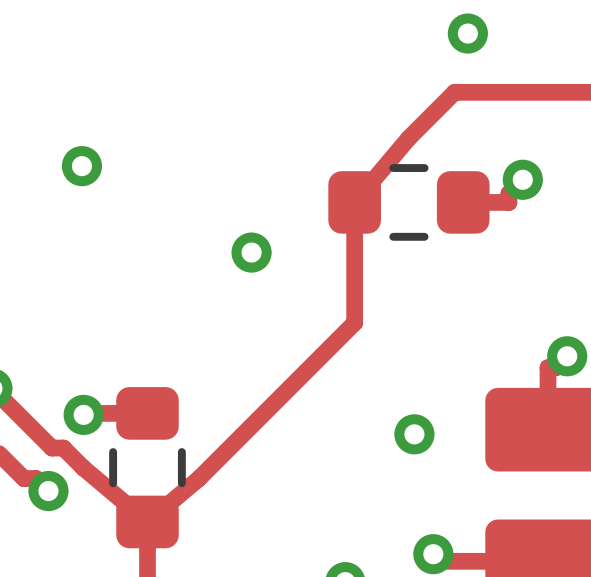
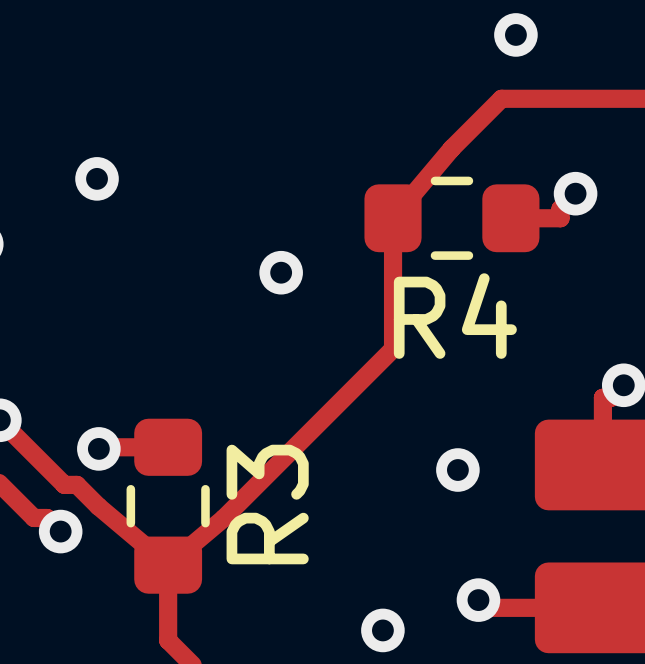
R4 name: none -> R4 (455, 316)
R3 name: none -> R3 (267, 504)

